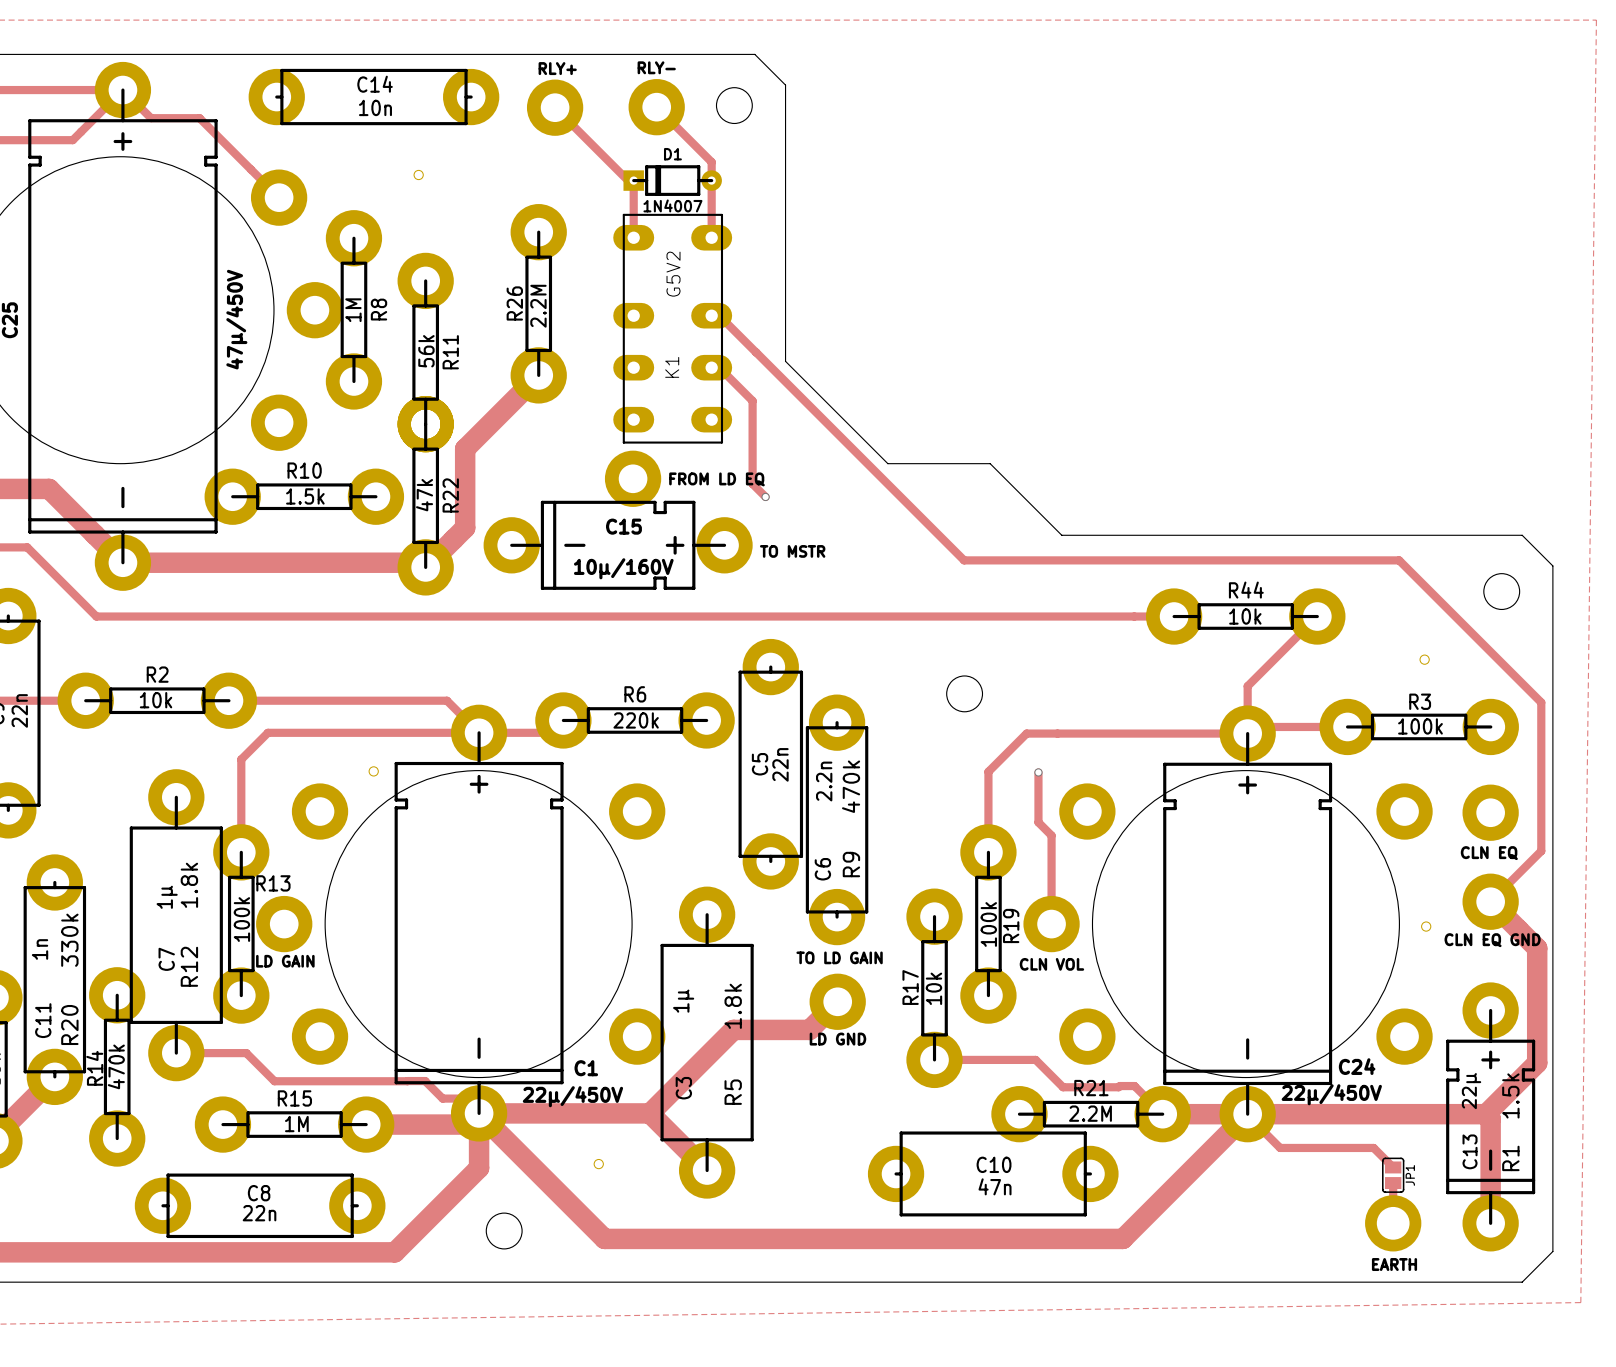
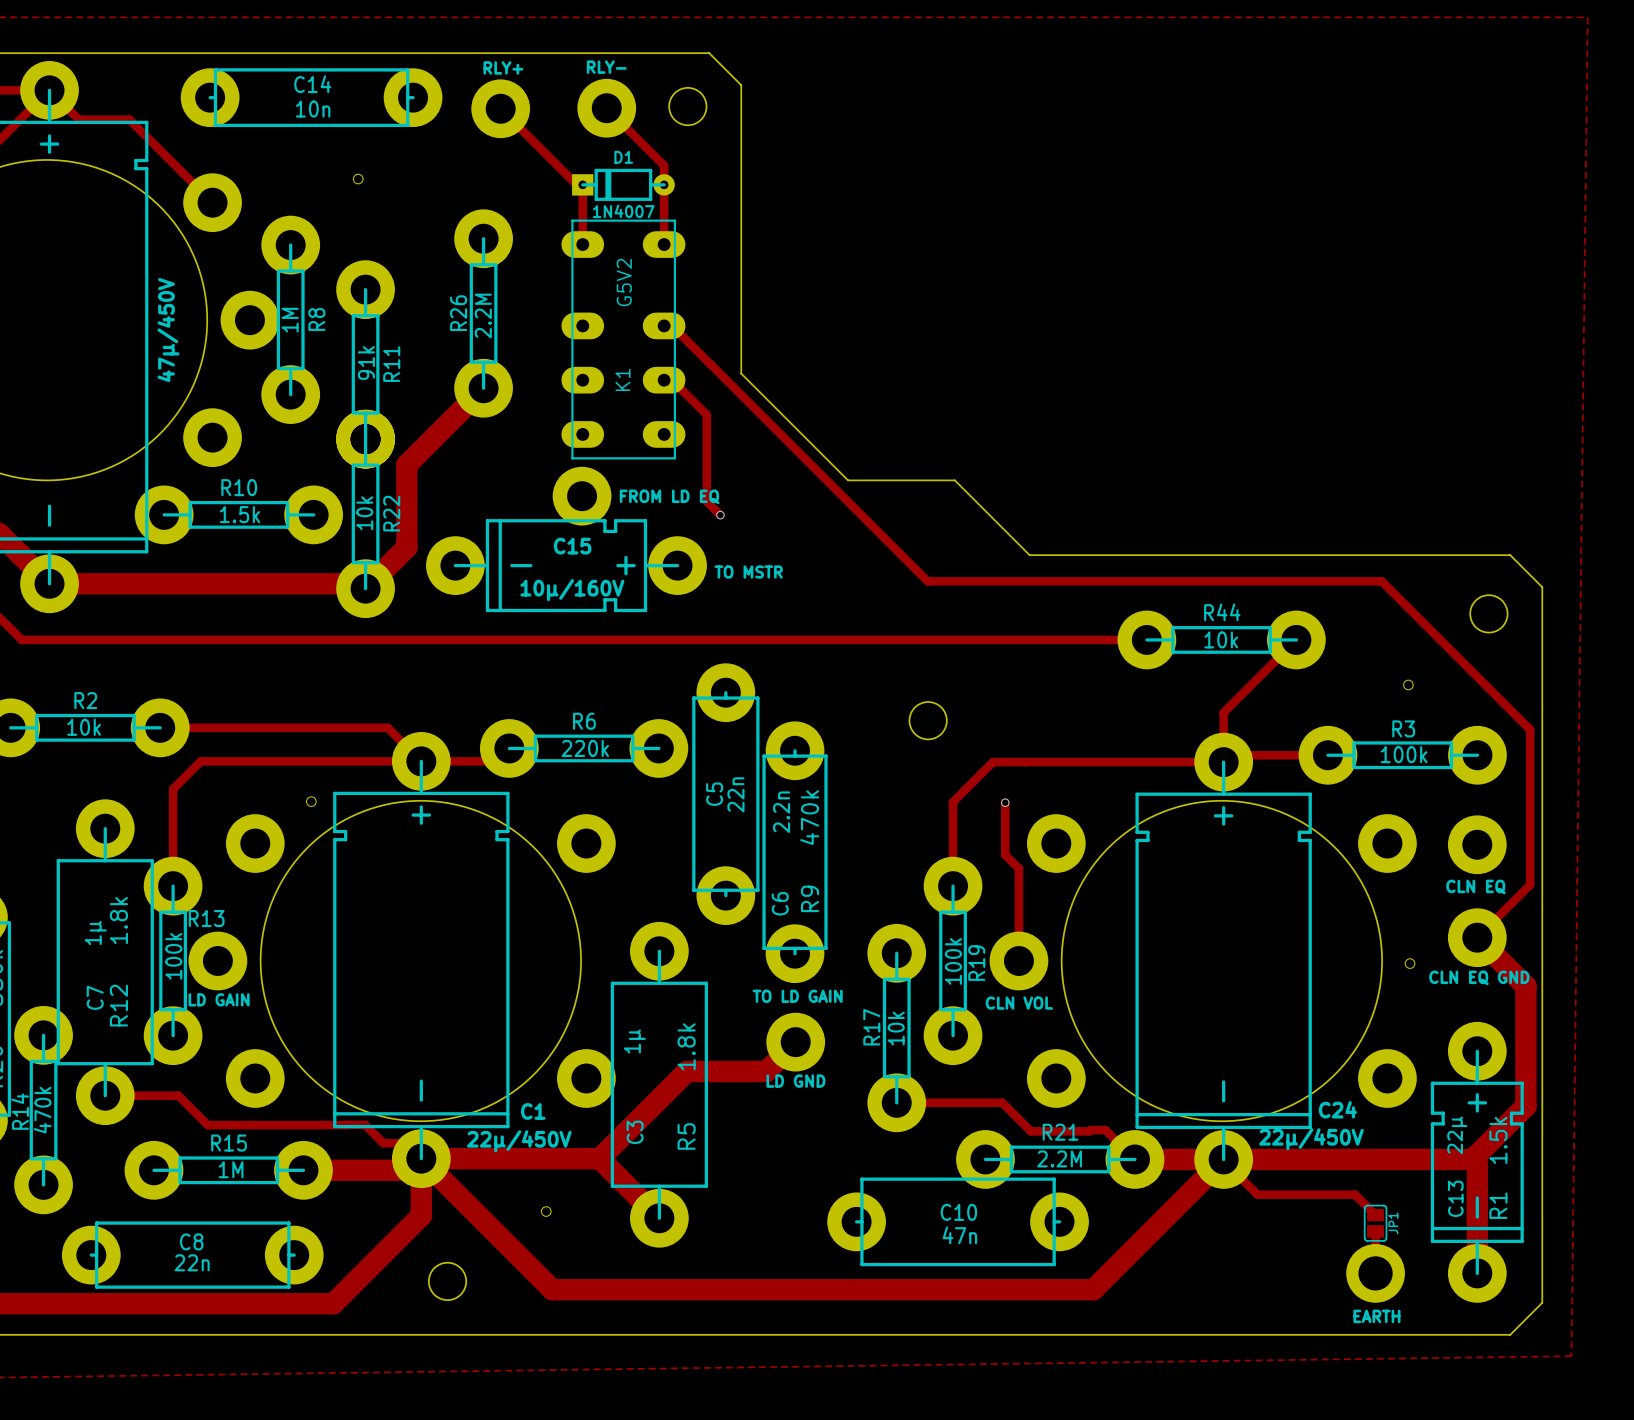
R11 value: 56k (426, 351) -> 91k (366, 363)
R22 value: 47k (424, 495) -> 10k (364, 513)

